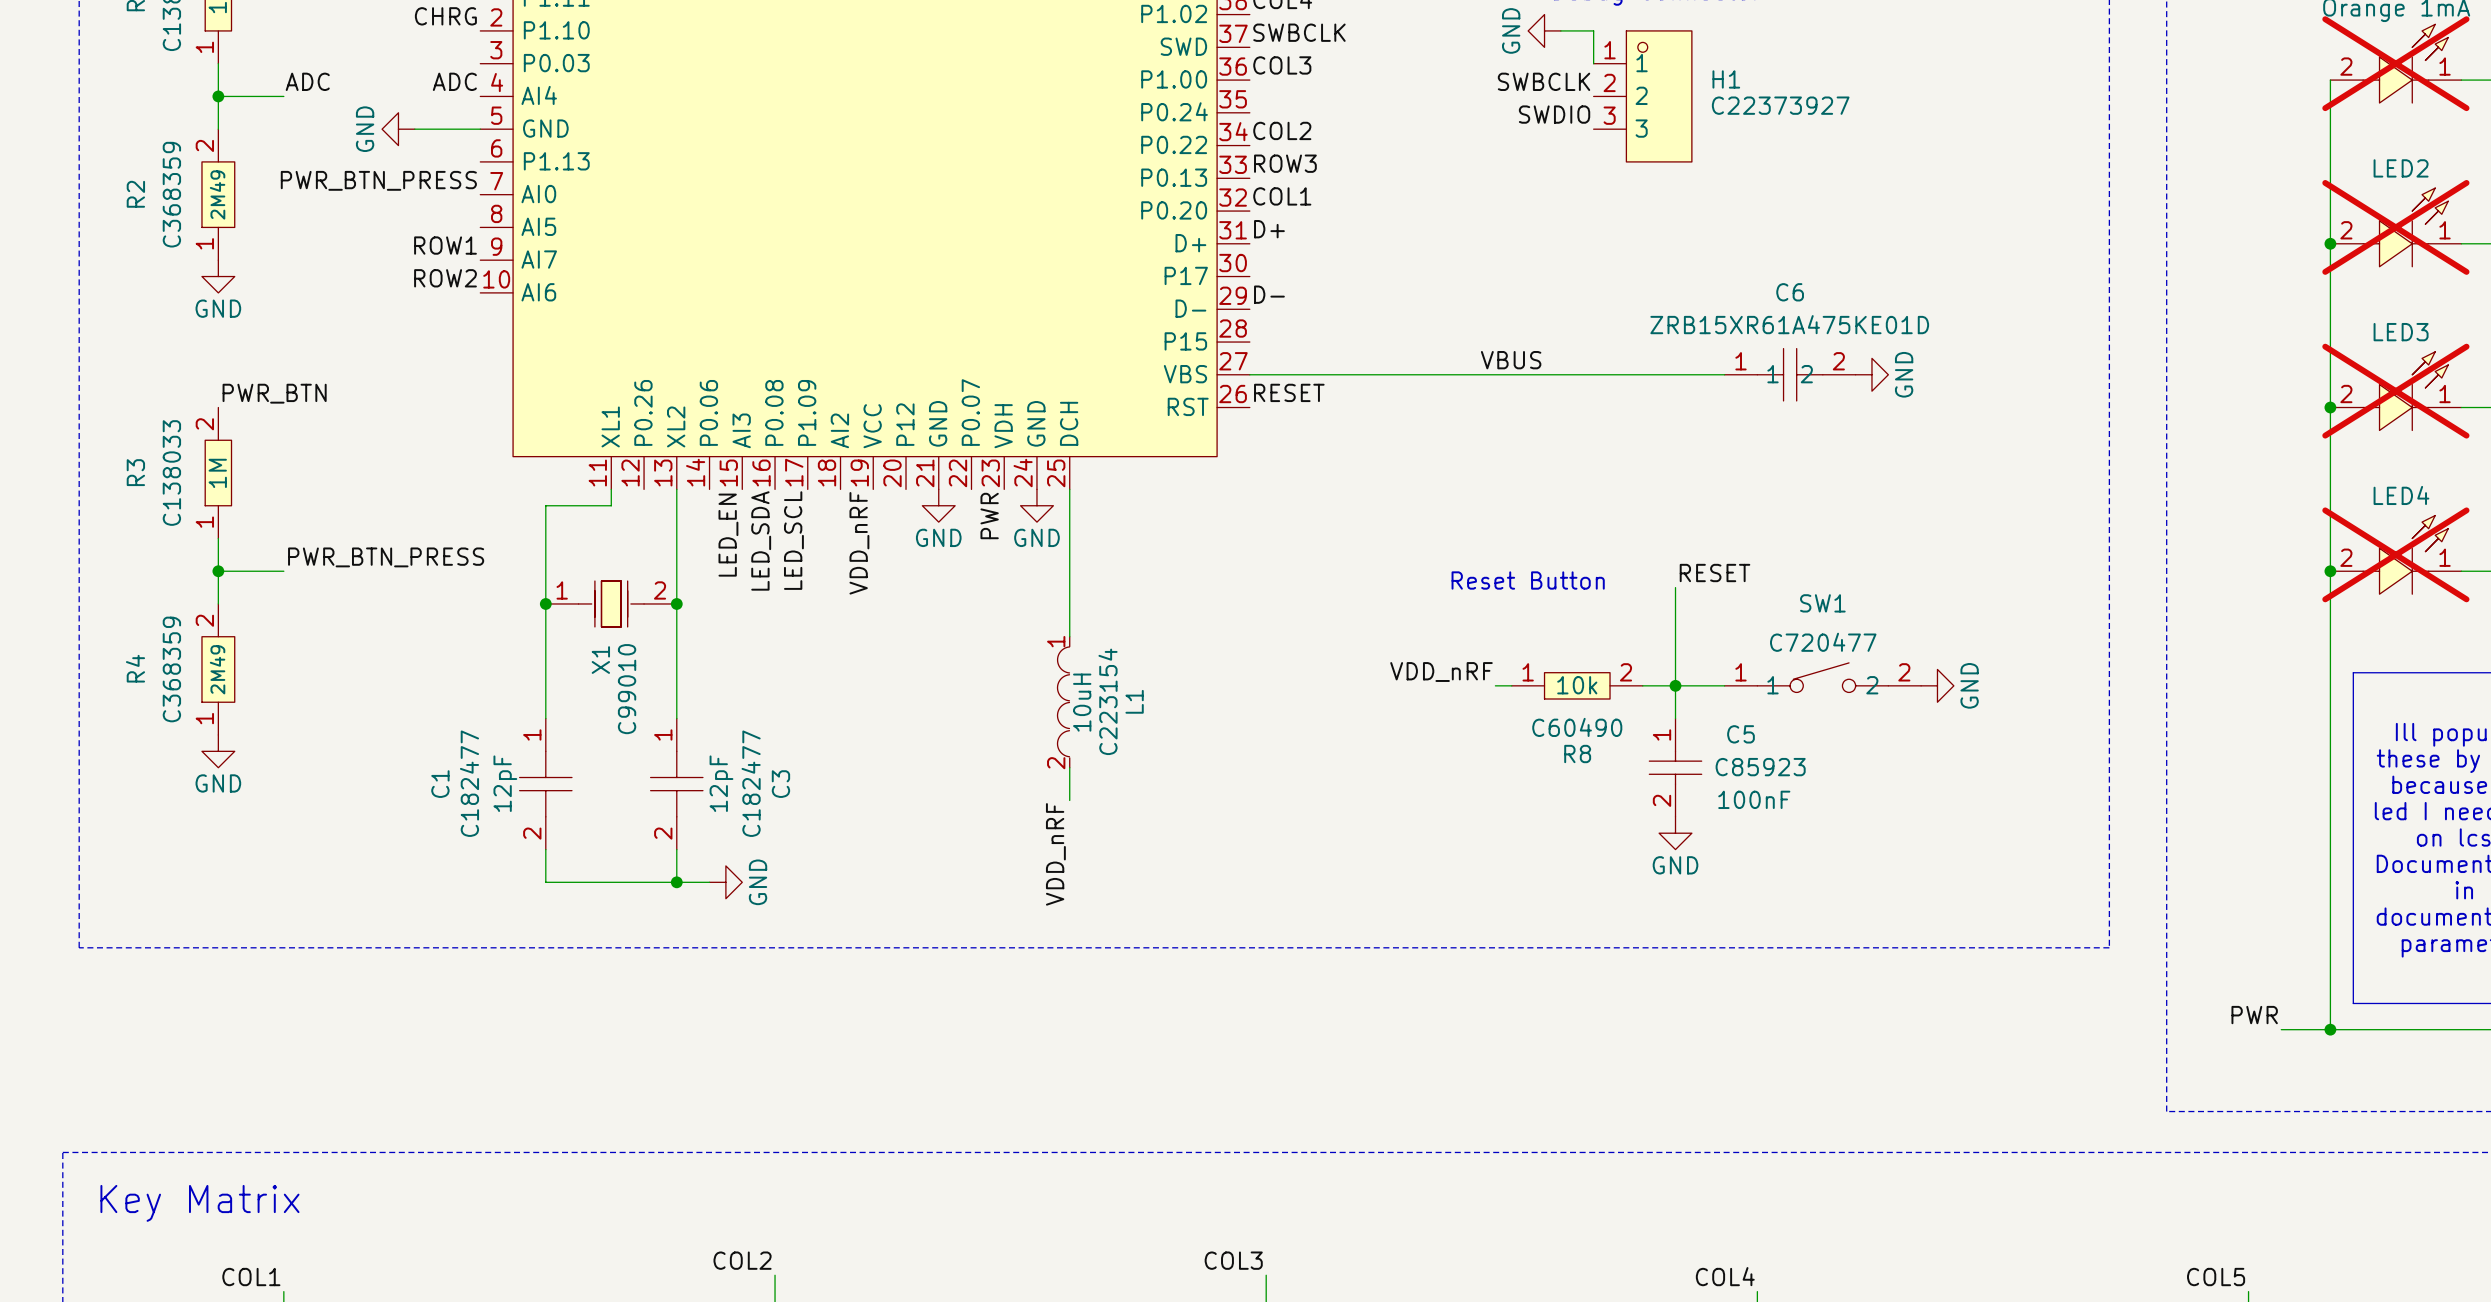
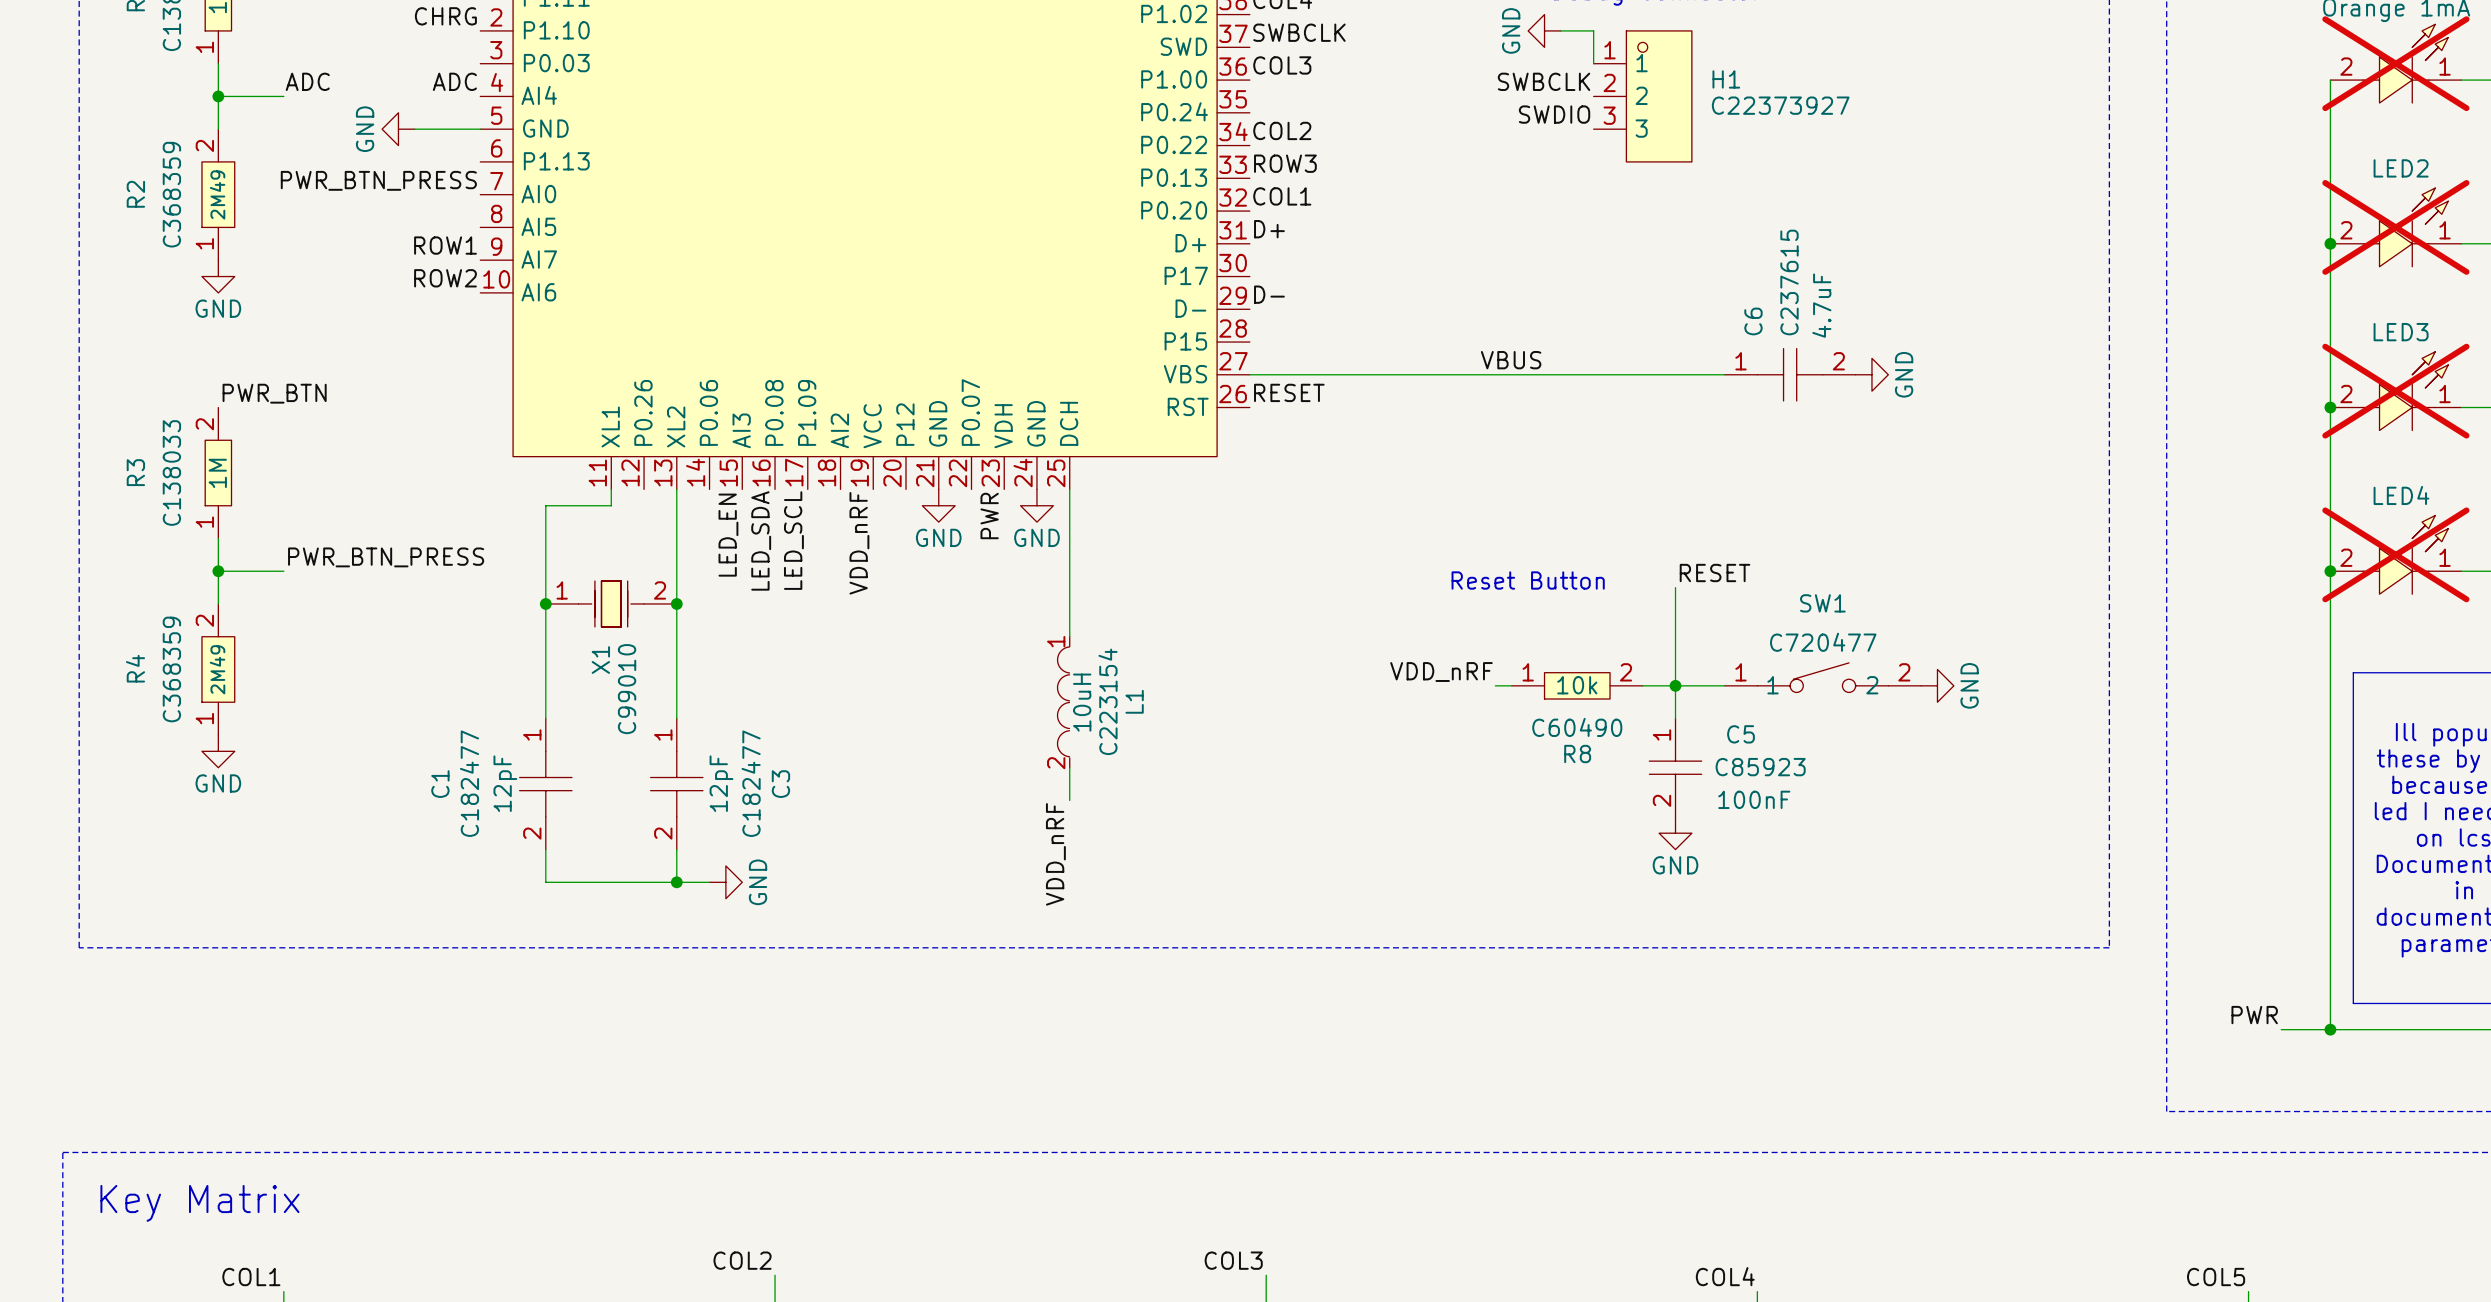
C6 text: none -> C237615 (1789, 282)
C6 name rotation: 0° (1790, 292) -> 90° counterclockwise (1753, 321)
C6 name position: C6 (1790, 292) -> C6 (1753, 321)
C6 text: none -> 4.7uF (1821, 305)
C6 value: ZRB15XR61A475KE01D (1789, 324) -> none
C6 pin name: 1 (1773, 374) -> none
C6 pin name: 2 (1806, 374) -> none

